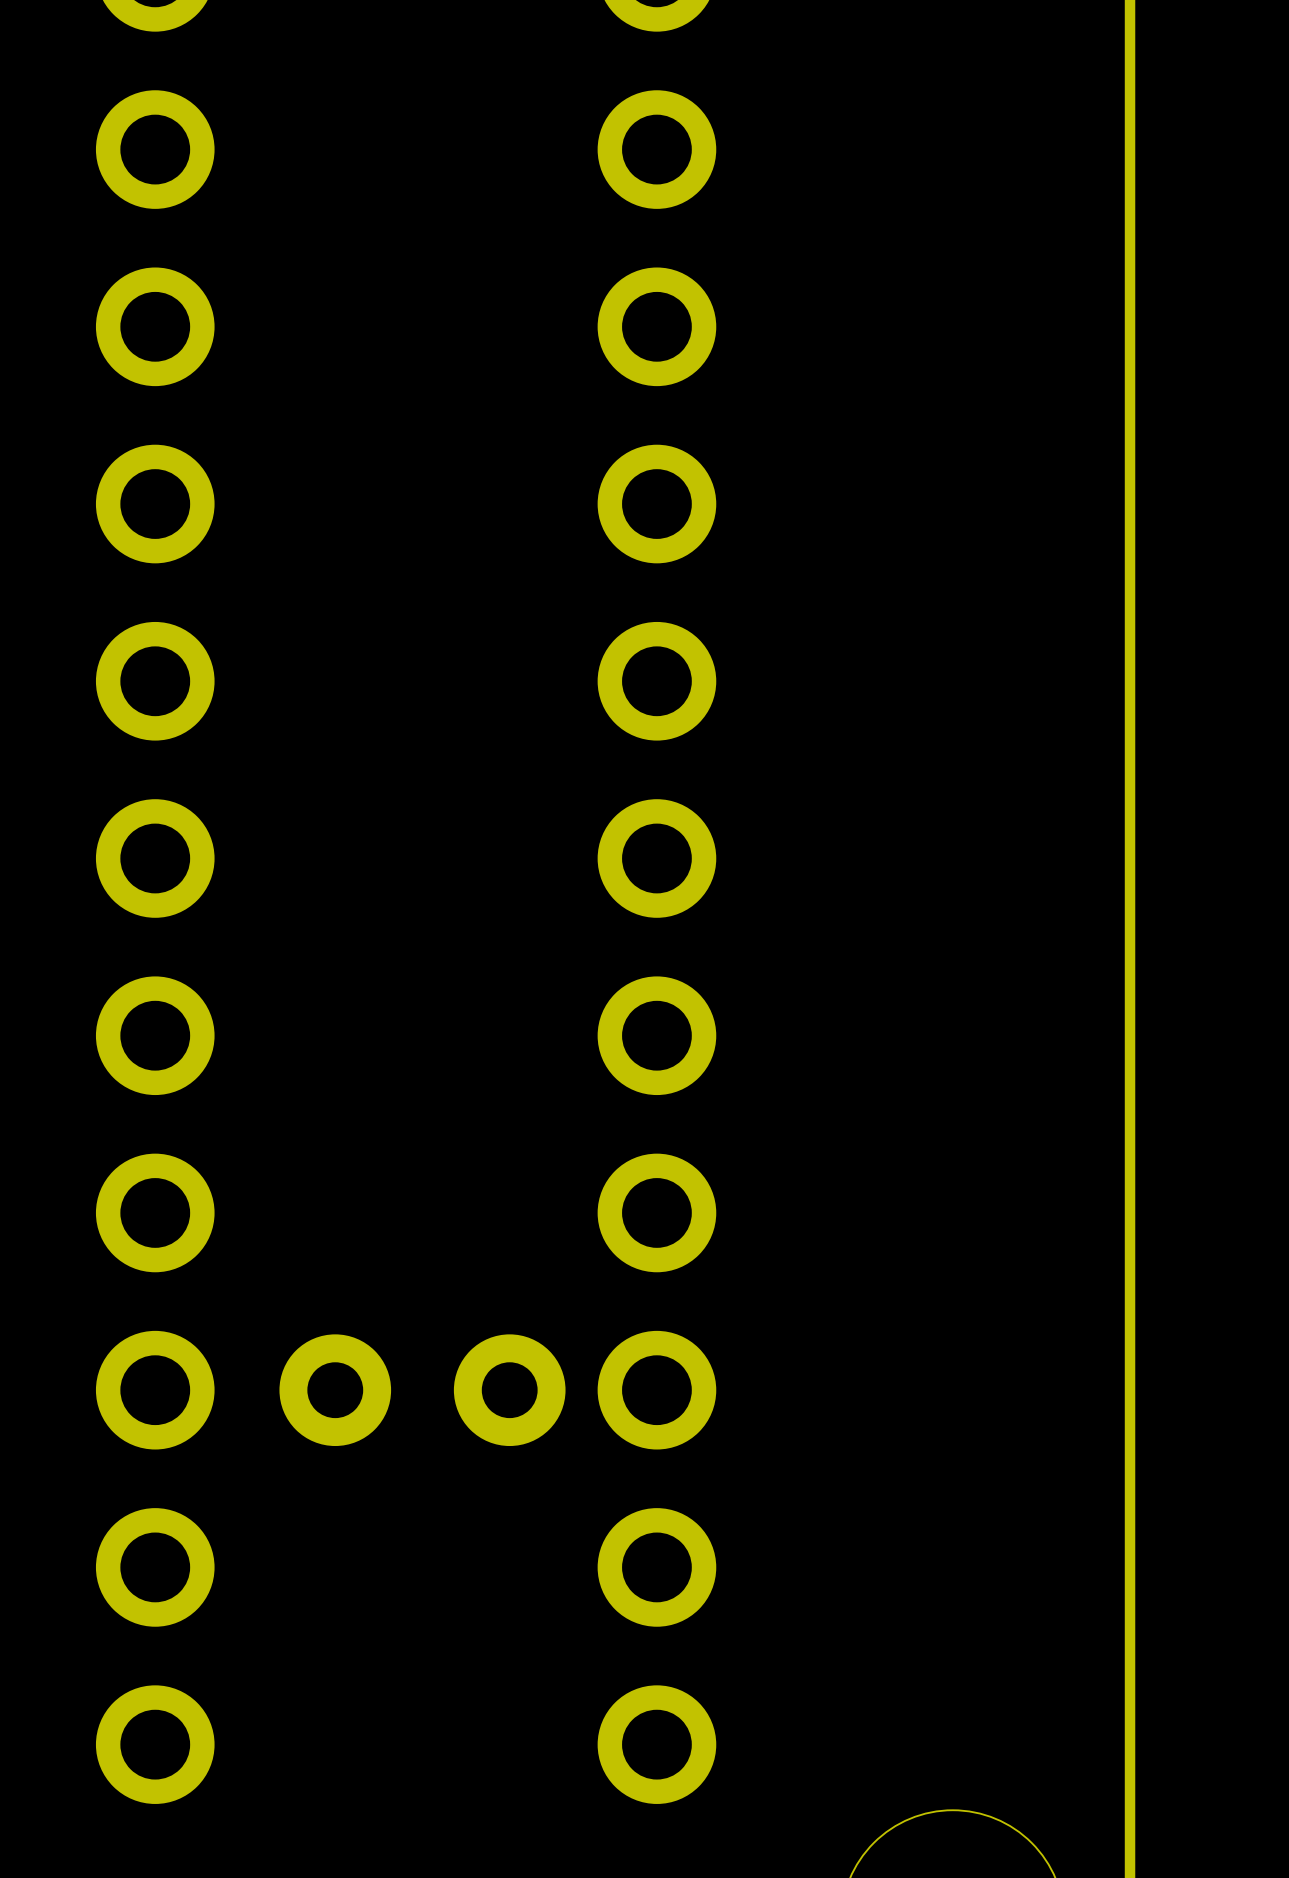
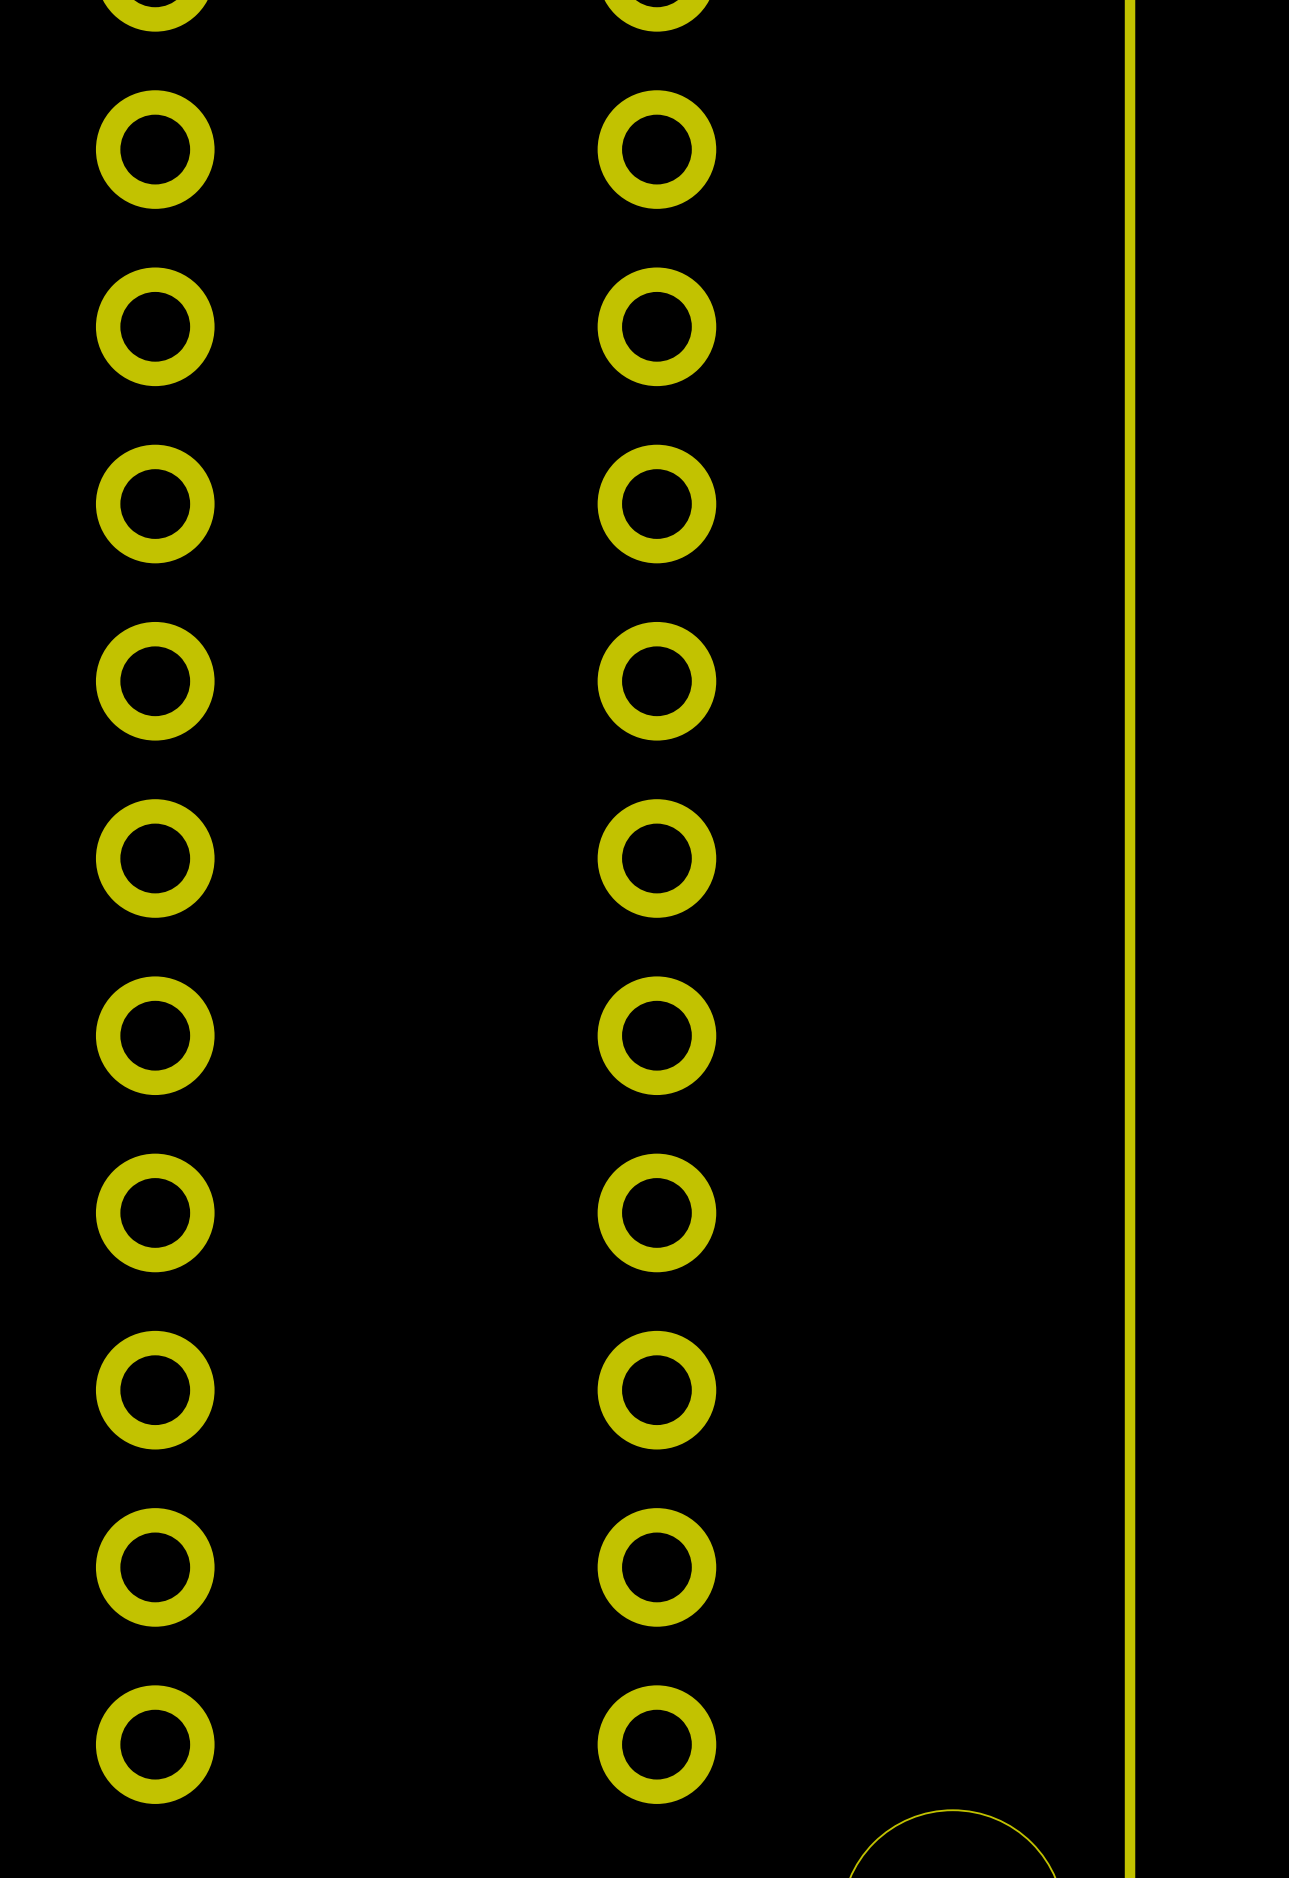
part: (422, 1390) -> none

